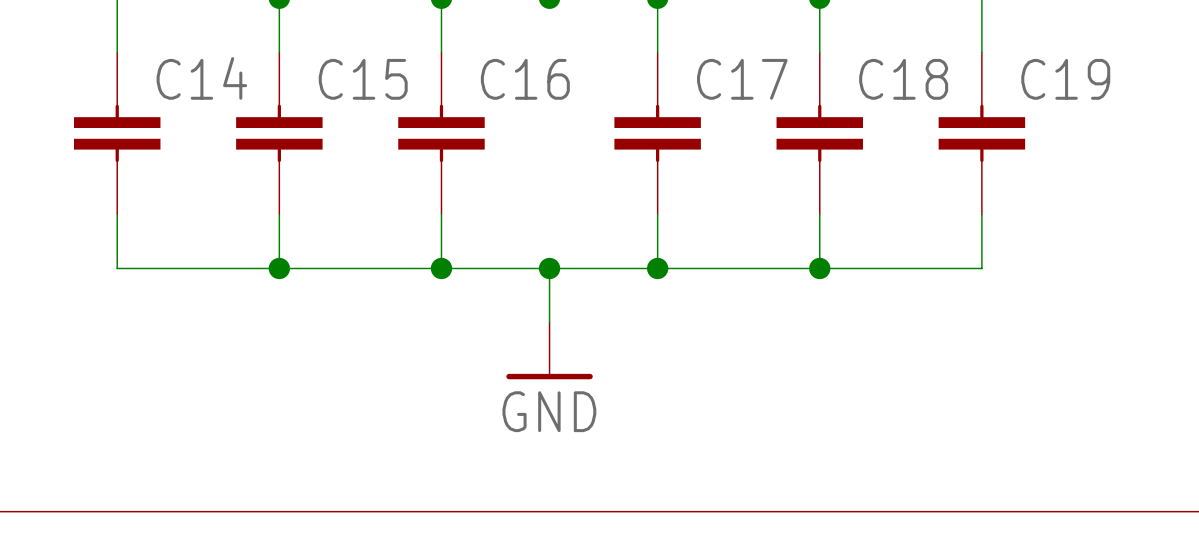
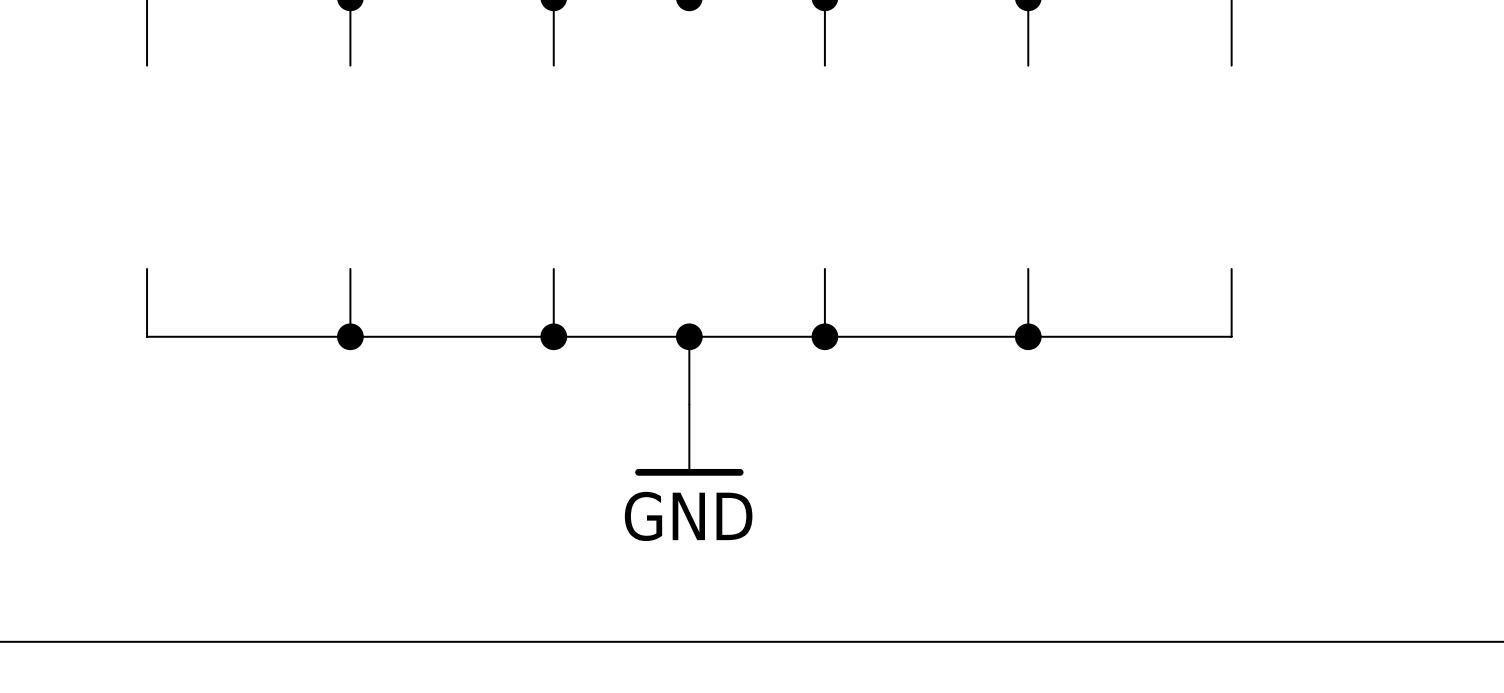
C14: (117, 133) -> none
C15: (279, 133) -> none
C16: (441, 133) -> none
C17: (657, 133) -> none
C18: (819, 133) -> none
C19: (981, 133) -> none

